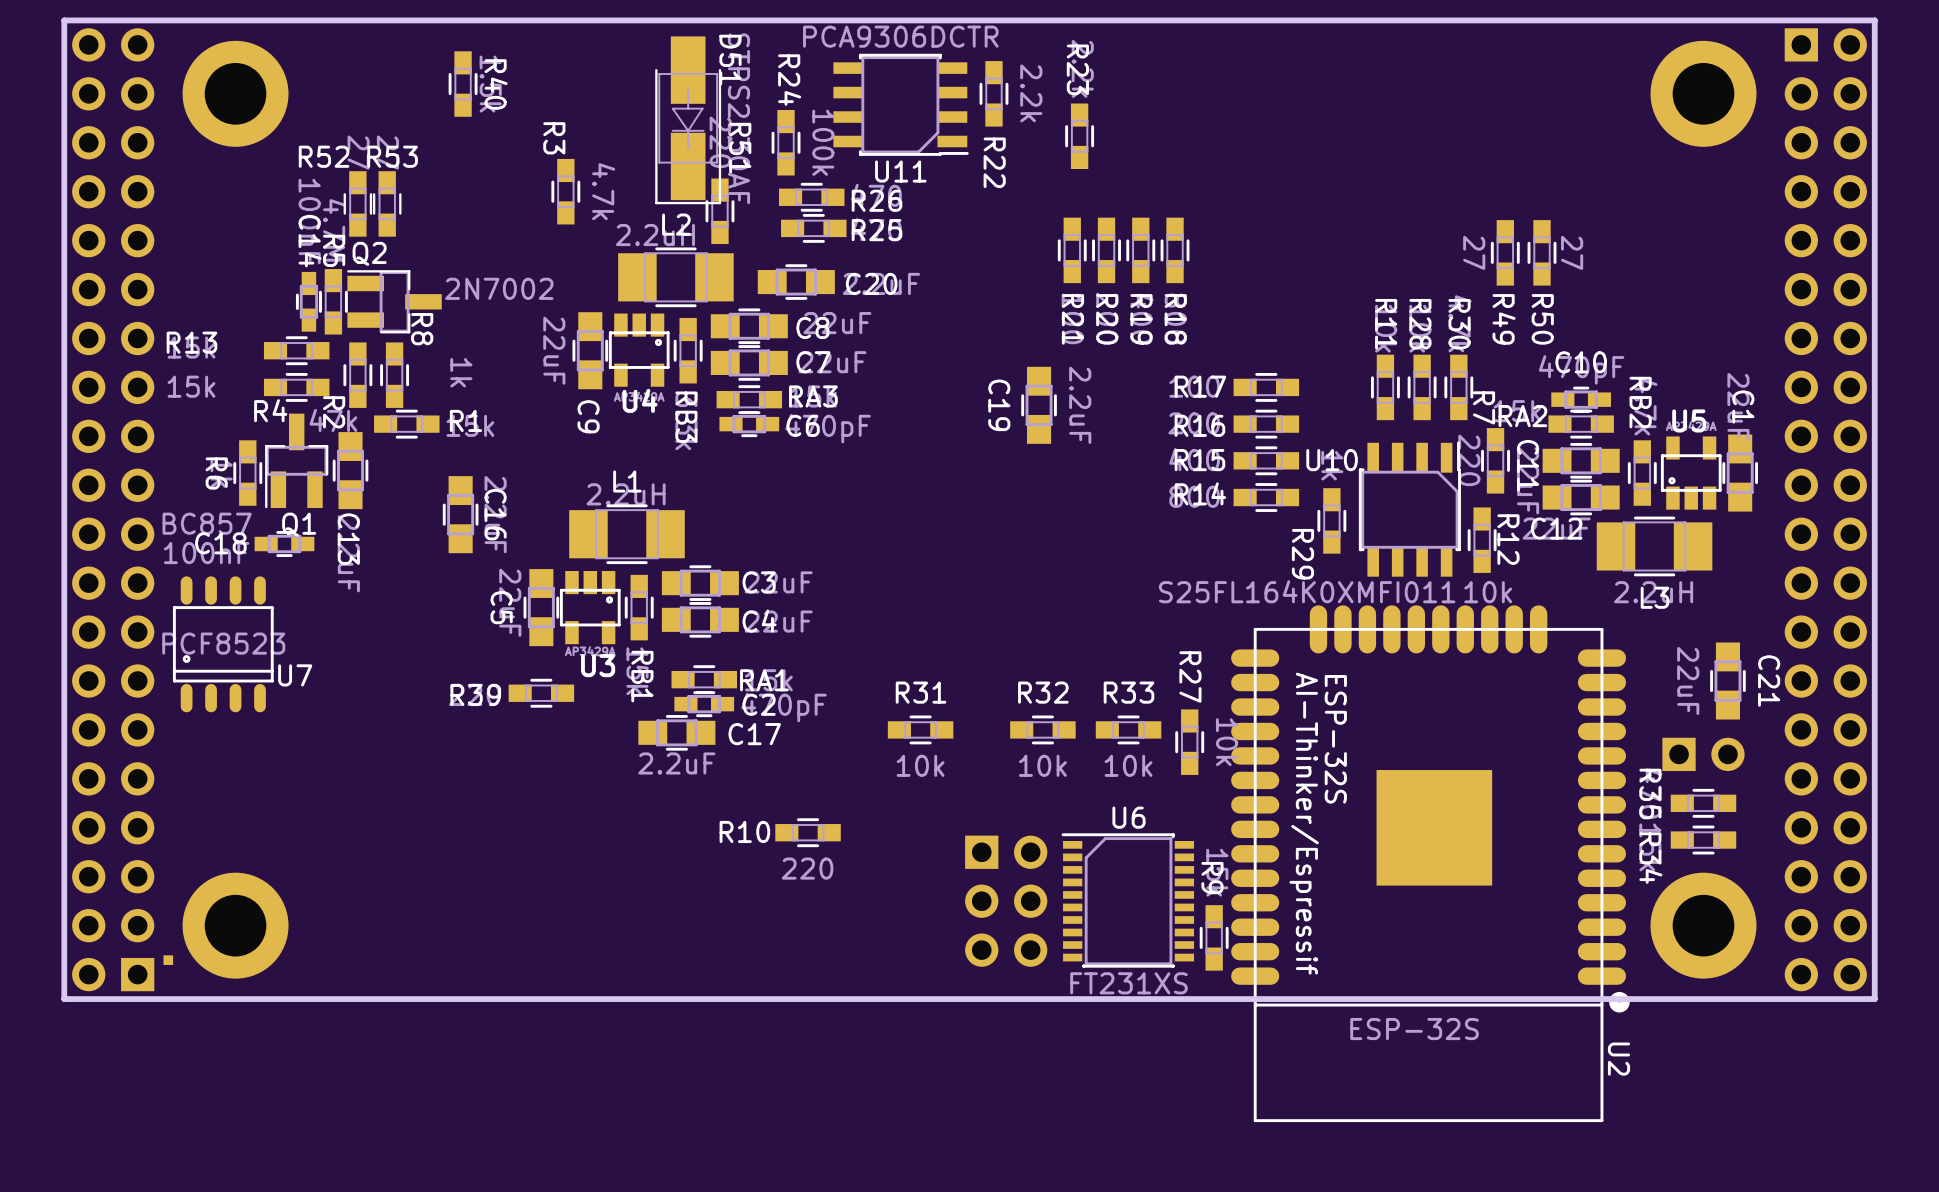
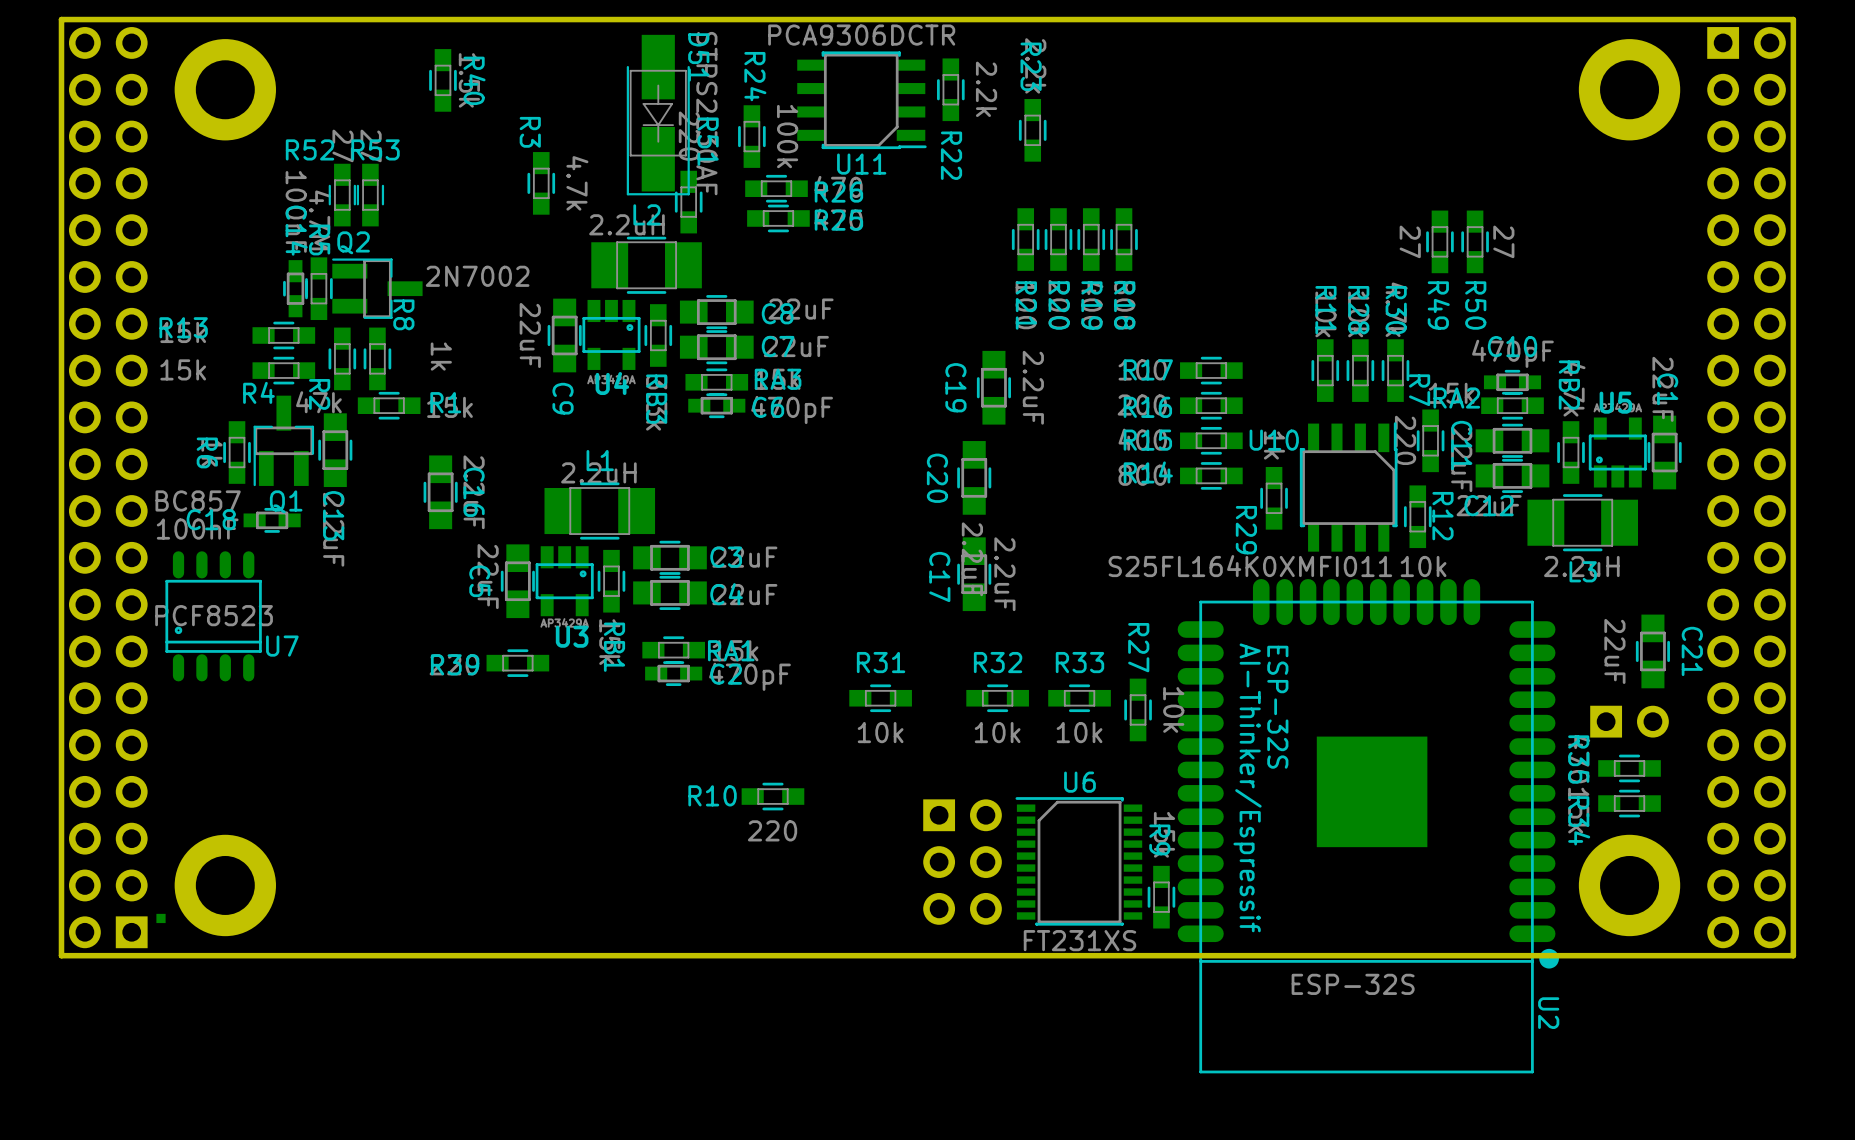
C20 rotation: 0° (796, 282) -> 90° clockwise (974, 477)
C20 position: (796, 282) -> (974, 477)
C20 name position: C20 (871, 283) -> C20 (937, 478)
C17 rotation: 0° (676, 732) -> 90° clockwise (974, 574)
C17 position: (676, 732) -> (974, 574)
C17 name position: C17 (754, 734) -> C17 (939, 576)
C17 value position: 2.2uF (676, 763) -> 2.2uF (1004, 574)

